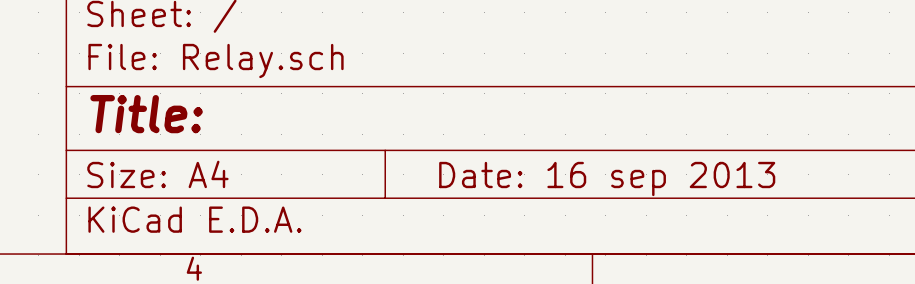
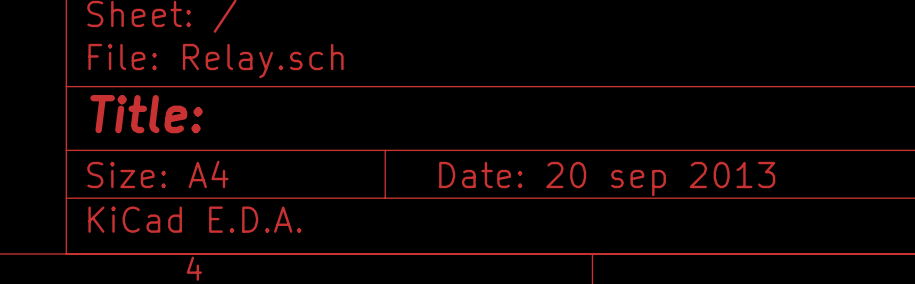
title block: Date: 16 sep 2013 (607, 178) -> Date: 20 sep 2013 (607, 178)

